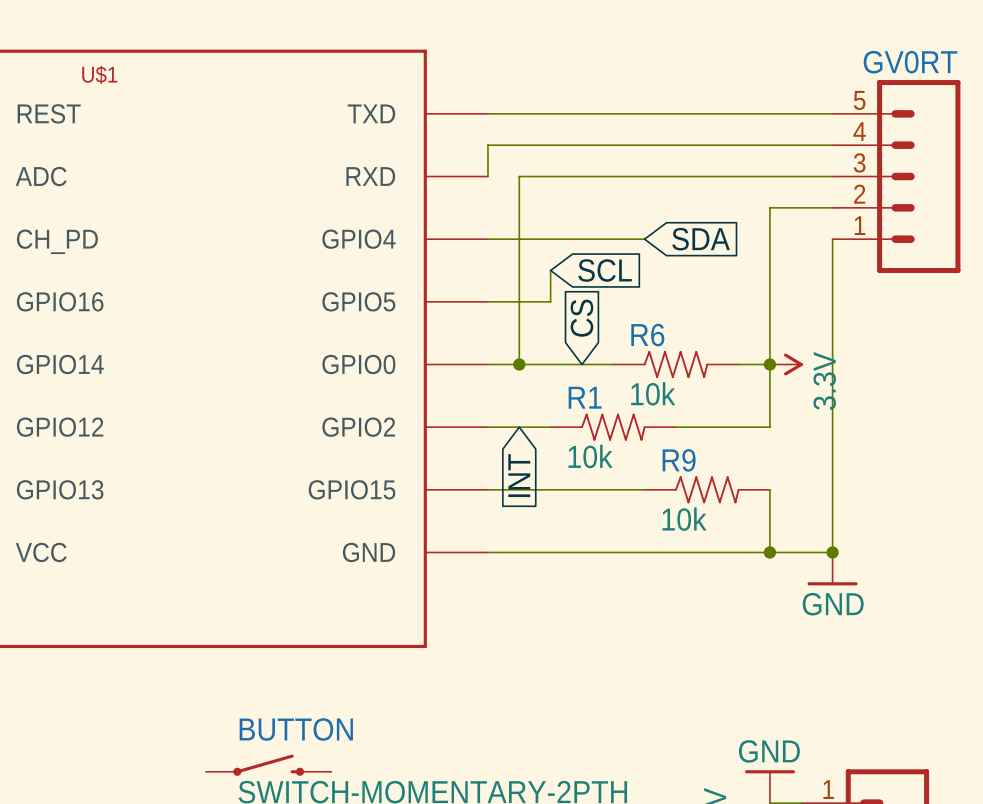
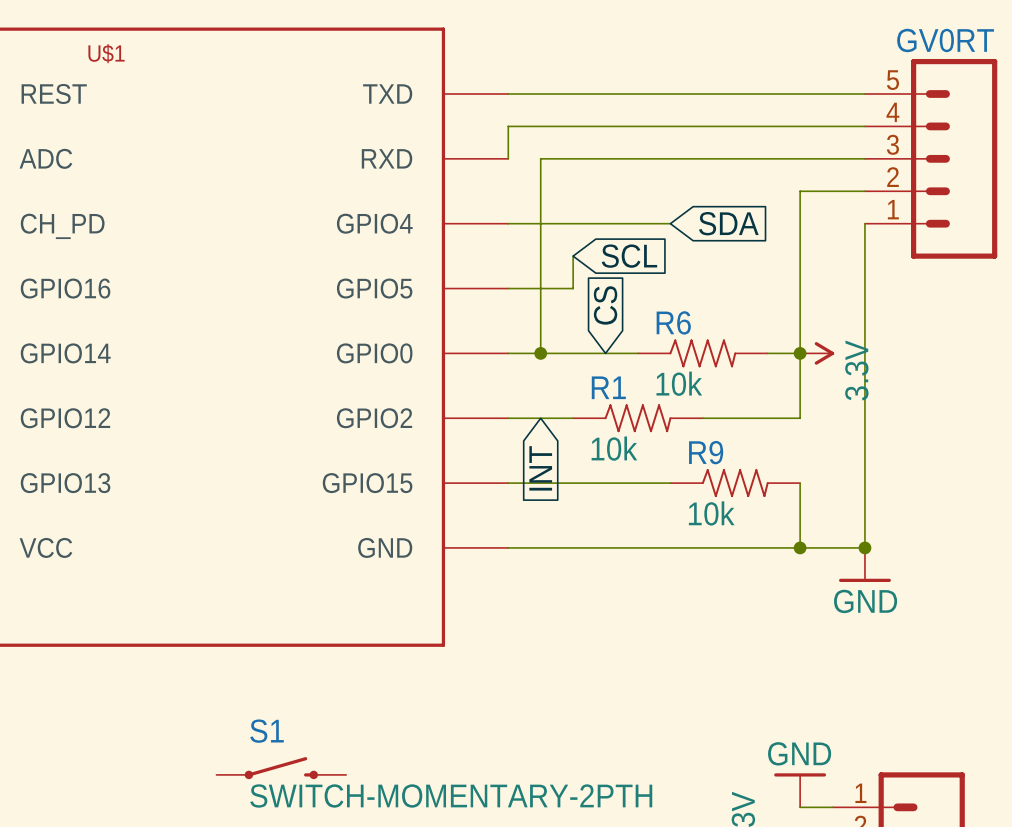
BUTTON name: BUTTON (296, 729) -> S1 (267, 731)

